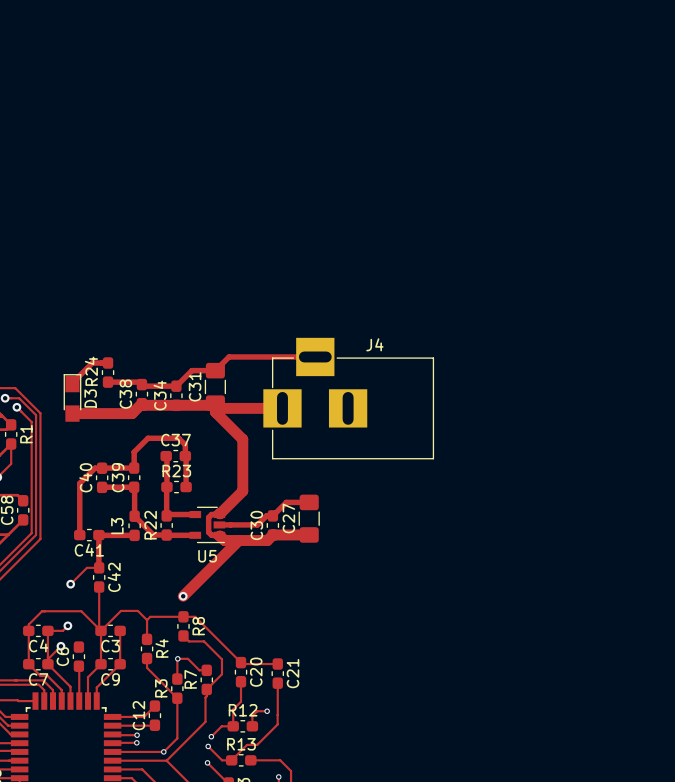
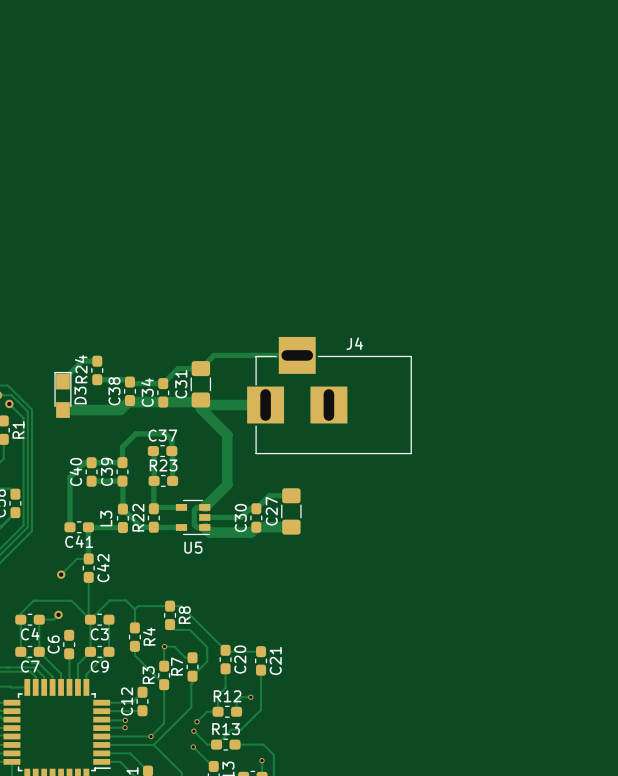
track: (238, 540) (183, 596) -> none
via: (183, 596) -> none
track: (60, 646) (47, 659) -> none
via: (60, 646) -> none

